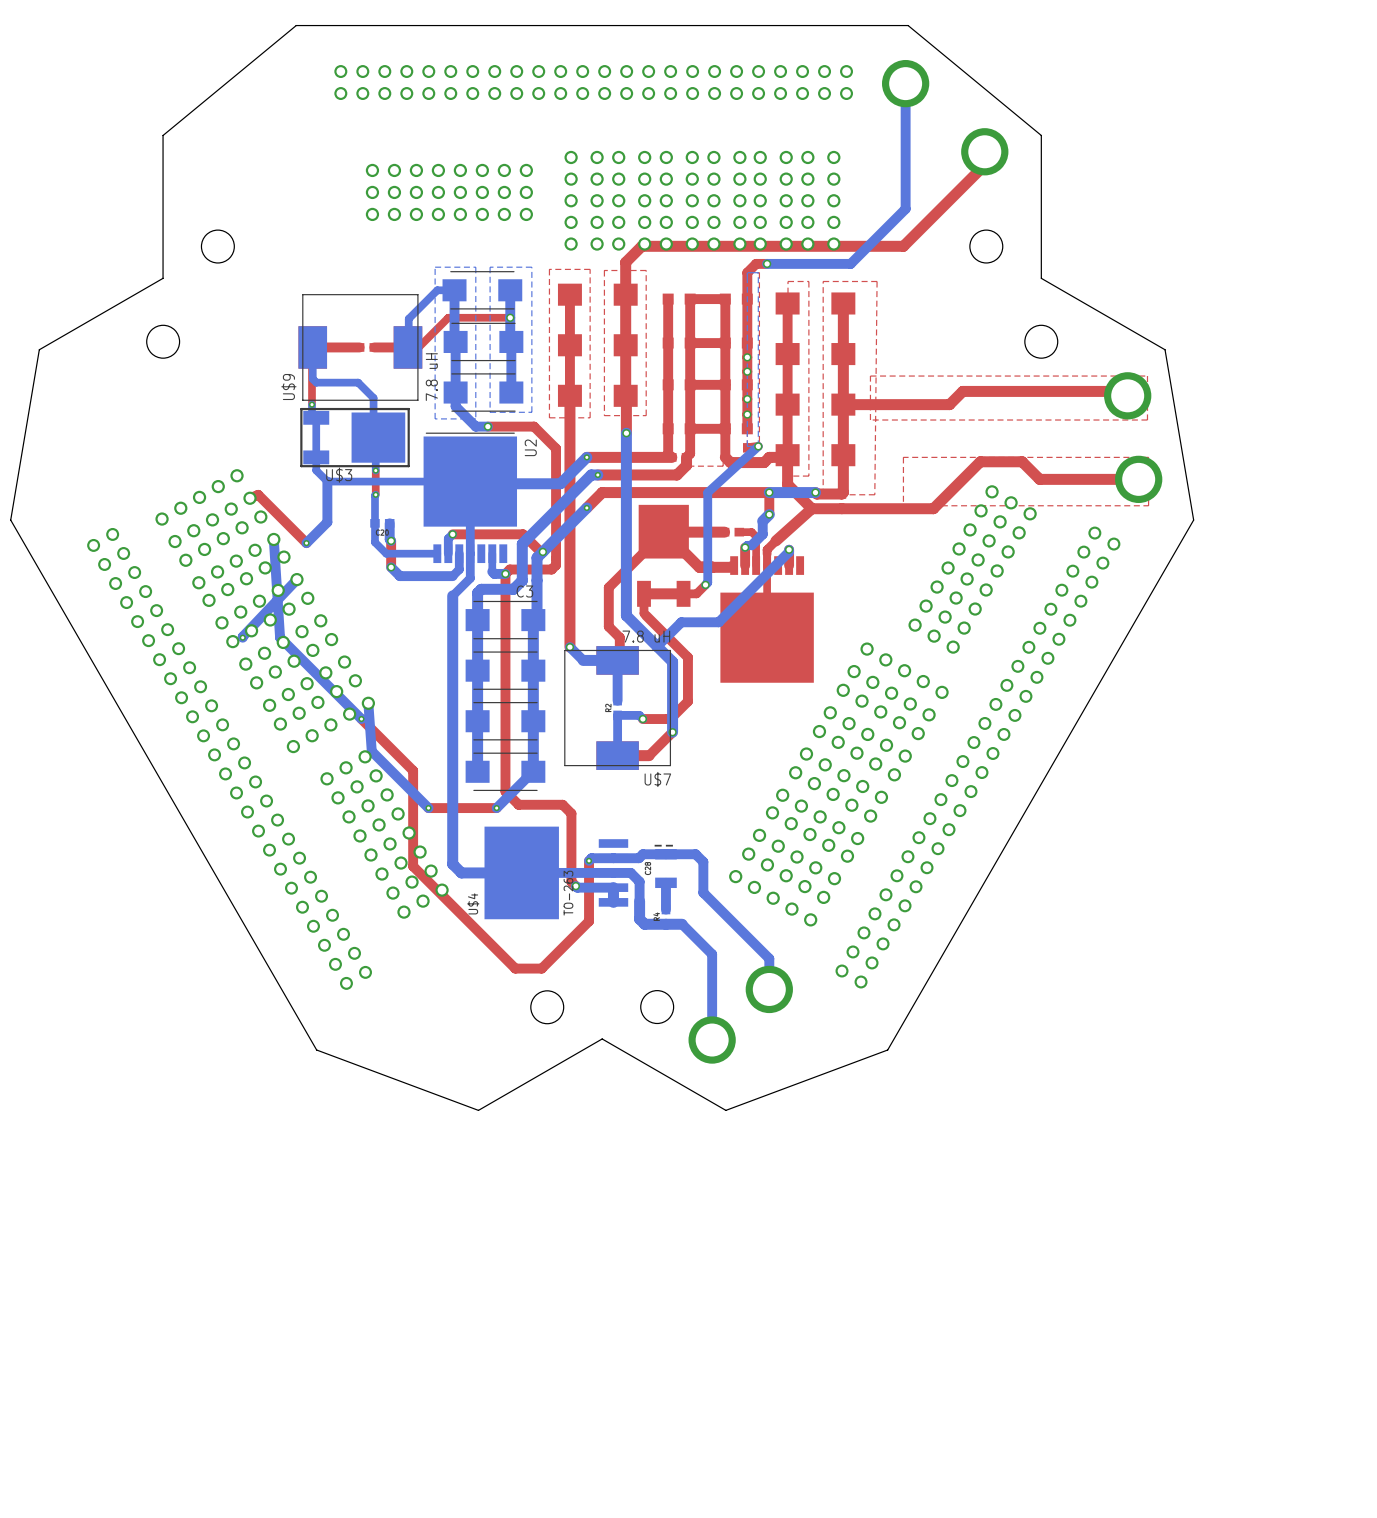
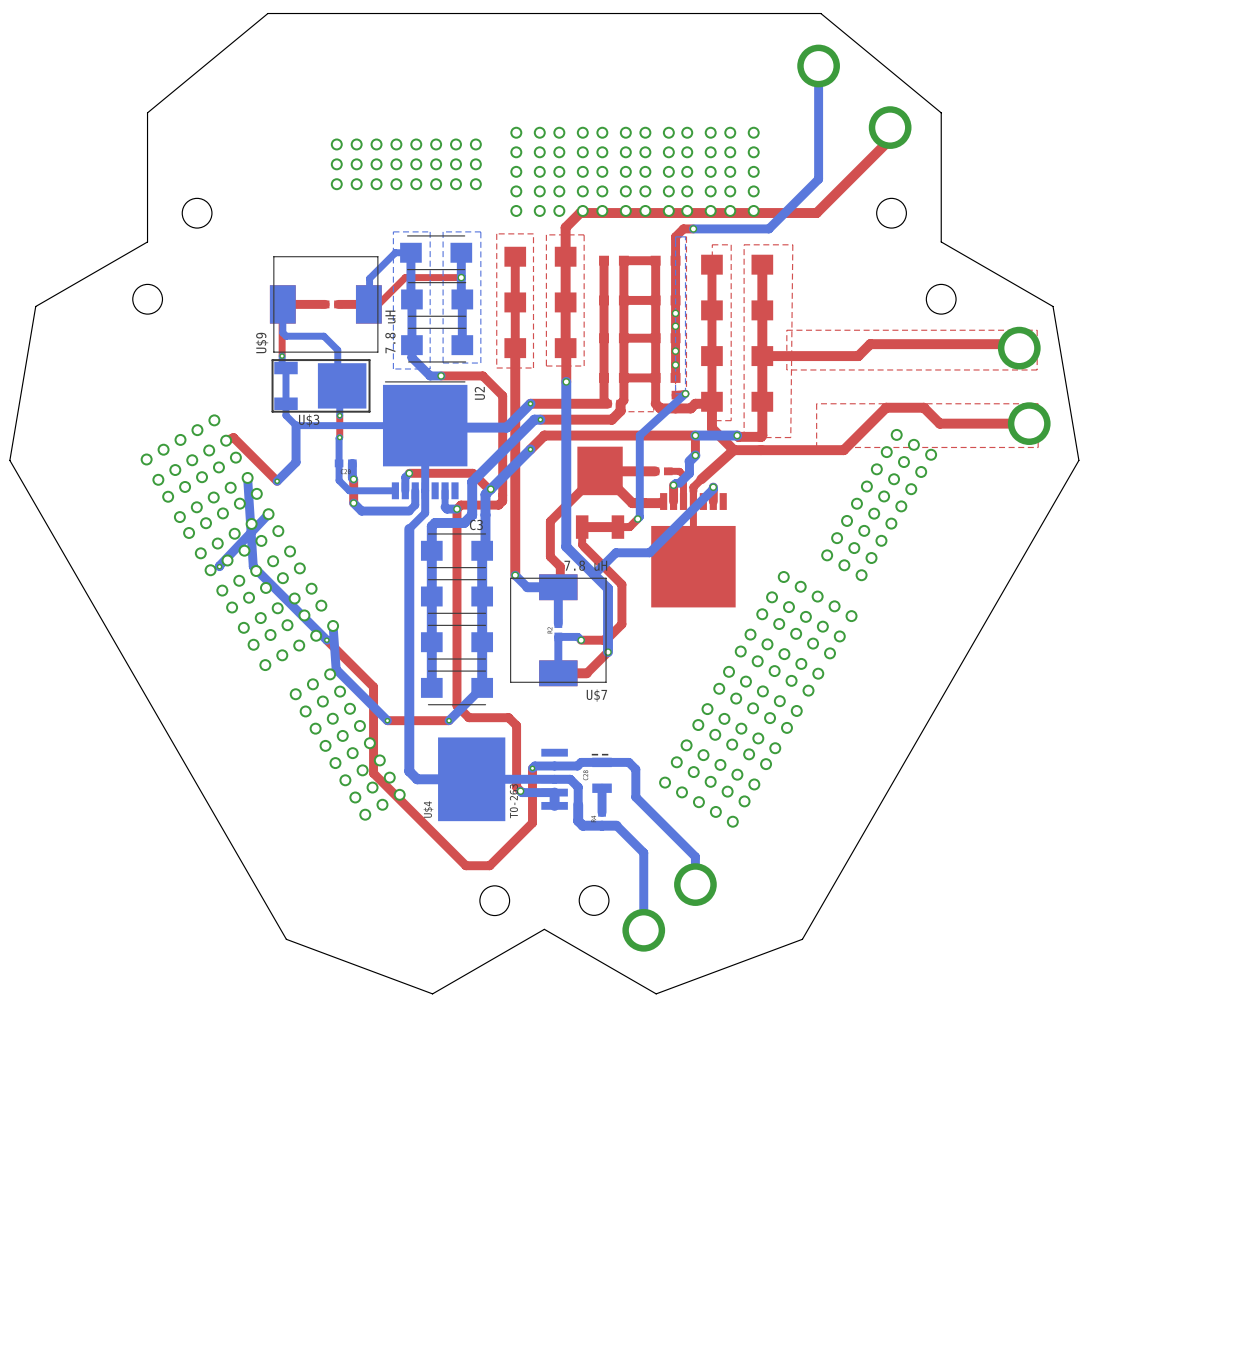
part: (593, 82) -> none
part: (977, 757) -> none
part: (229, 758) -> none

